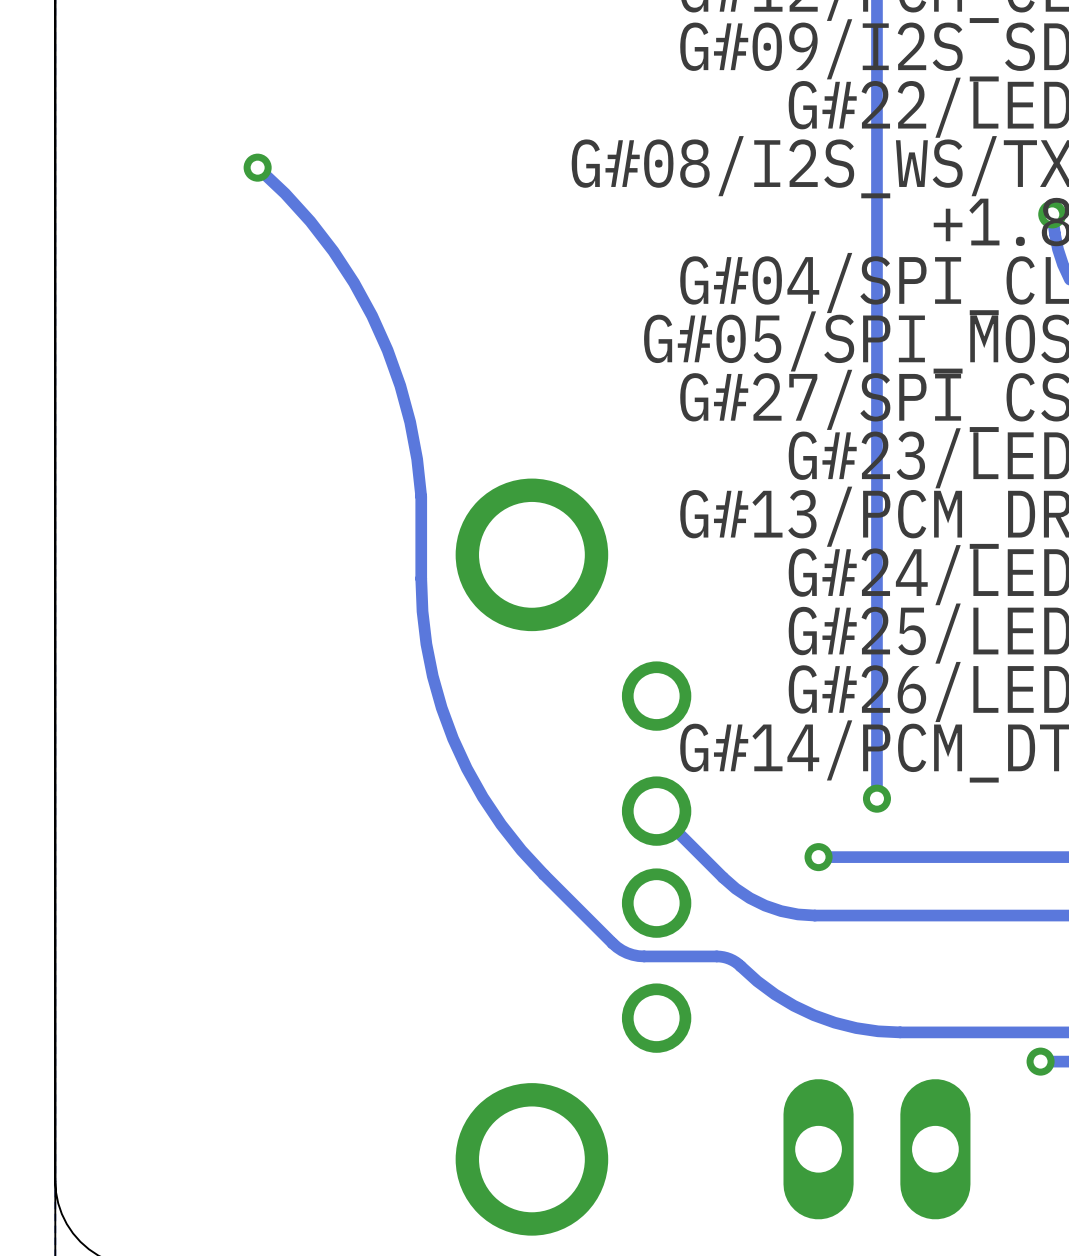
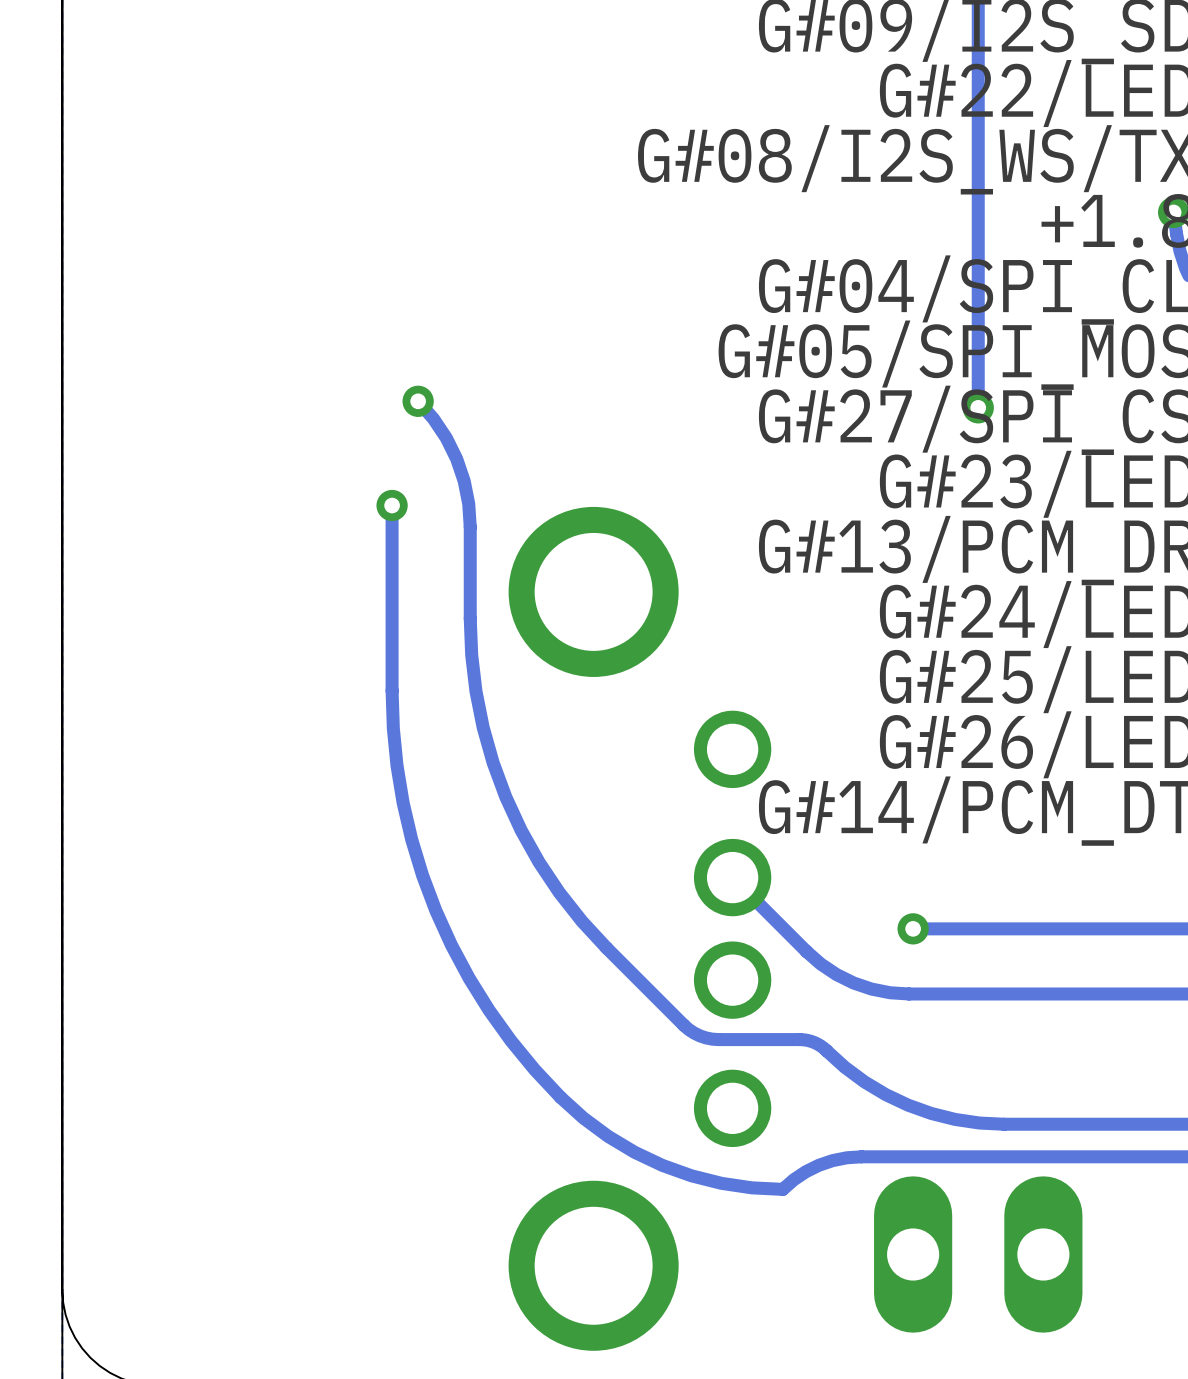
track: (257, 167) (310, 221) (333, 251) (372, 315) (387, 350) (410, 422) (421, 496) -> (418, 401) (433, 418) (446, 438) (456, 459) (464, 481) (468, 503) (470, 527)
via: (257, 167) -> none
via: none -> (418, 401)
track: (876, 389) (876, 798) -> none
via: none -> (978, 407)
track: none -> (392, 505) (393, 728) (403, 802) (422, 875) (451, 945) (488, 1010) (534, 1069) (583, 1117) (608, 1136) (634, 1152) (662, 1165) (691, 1175) (721, 1183) (752, 1187) (782, 1189) (805, 1171) (832, 1160) (846, 1157) (1160, 1156)
via: none -> (392, 505)
via: (876, 798) -> none
via: (1040, 1061) -> none

